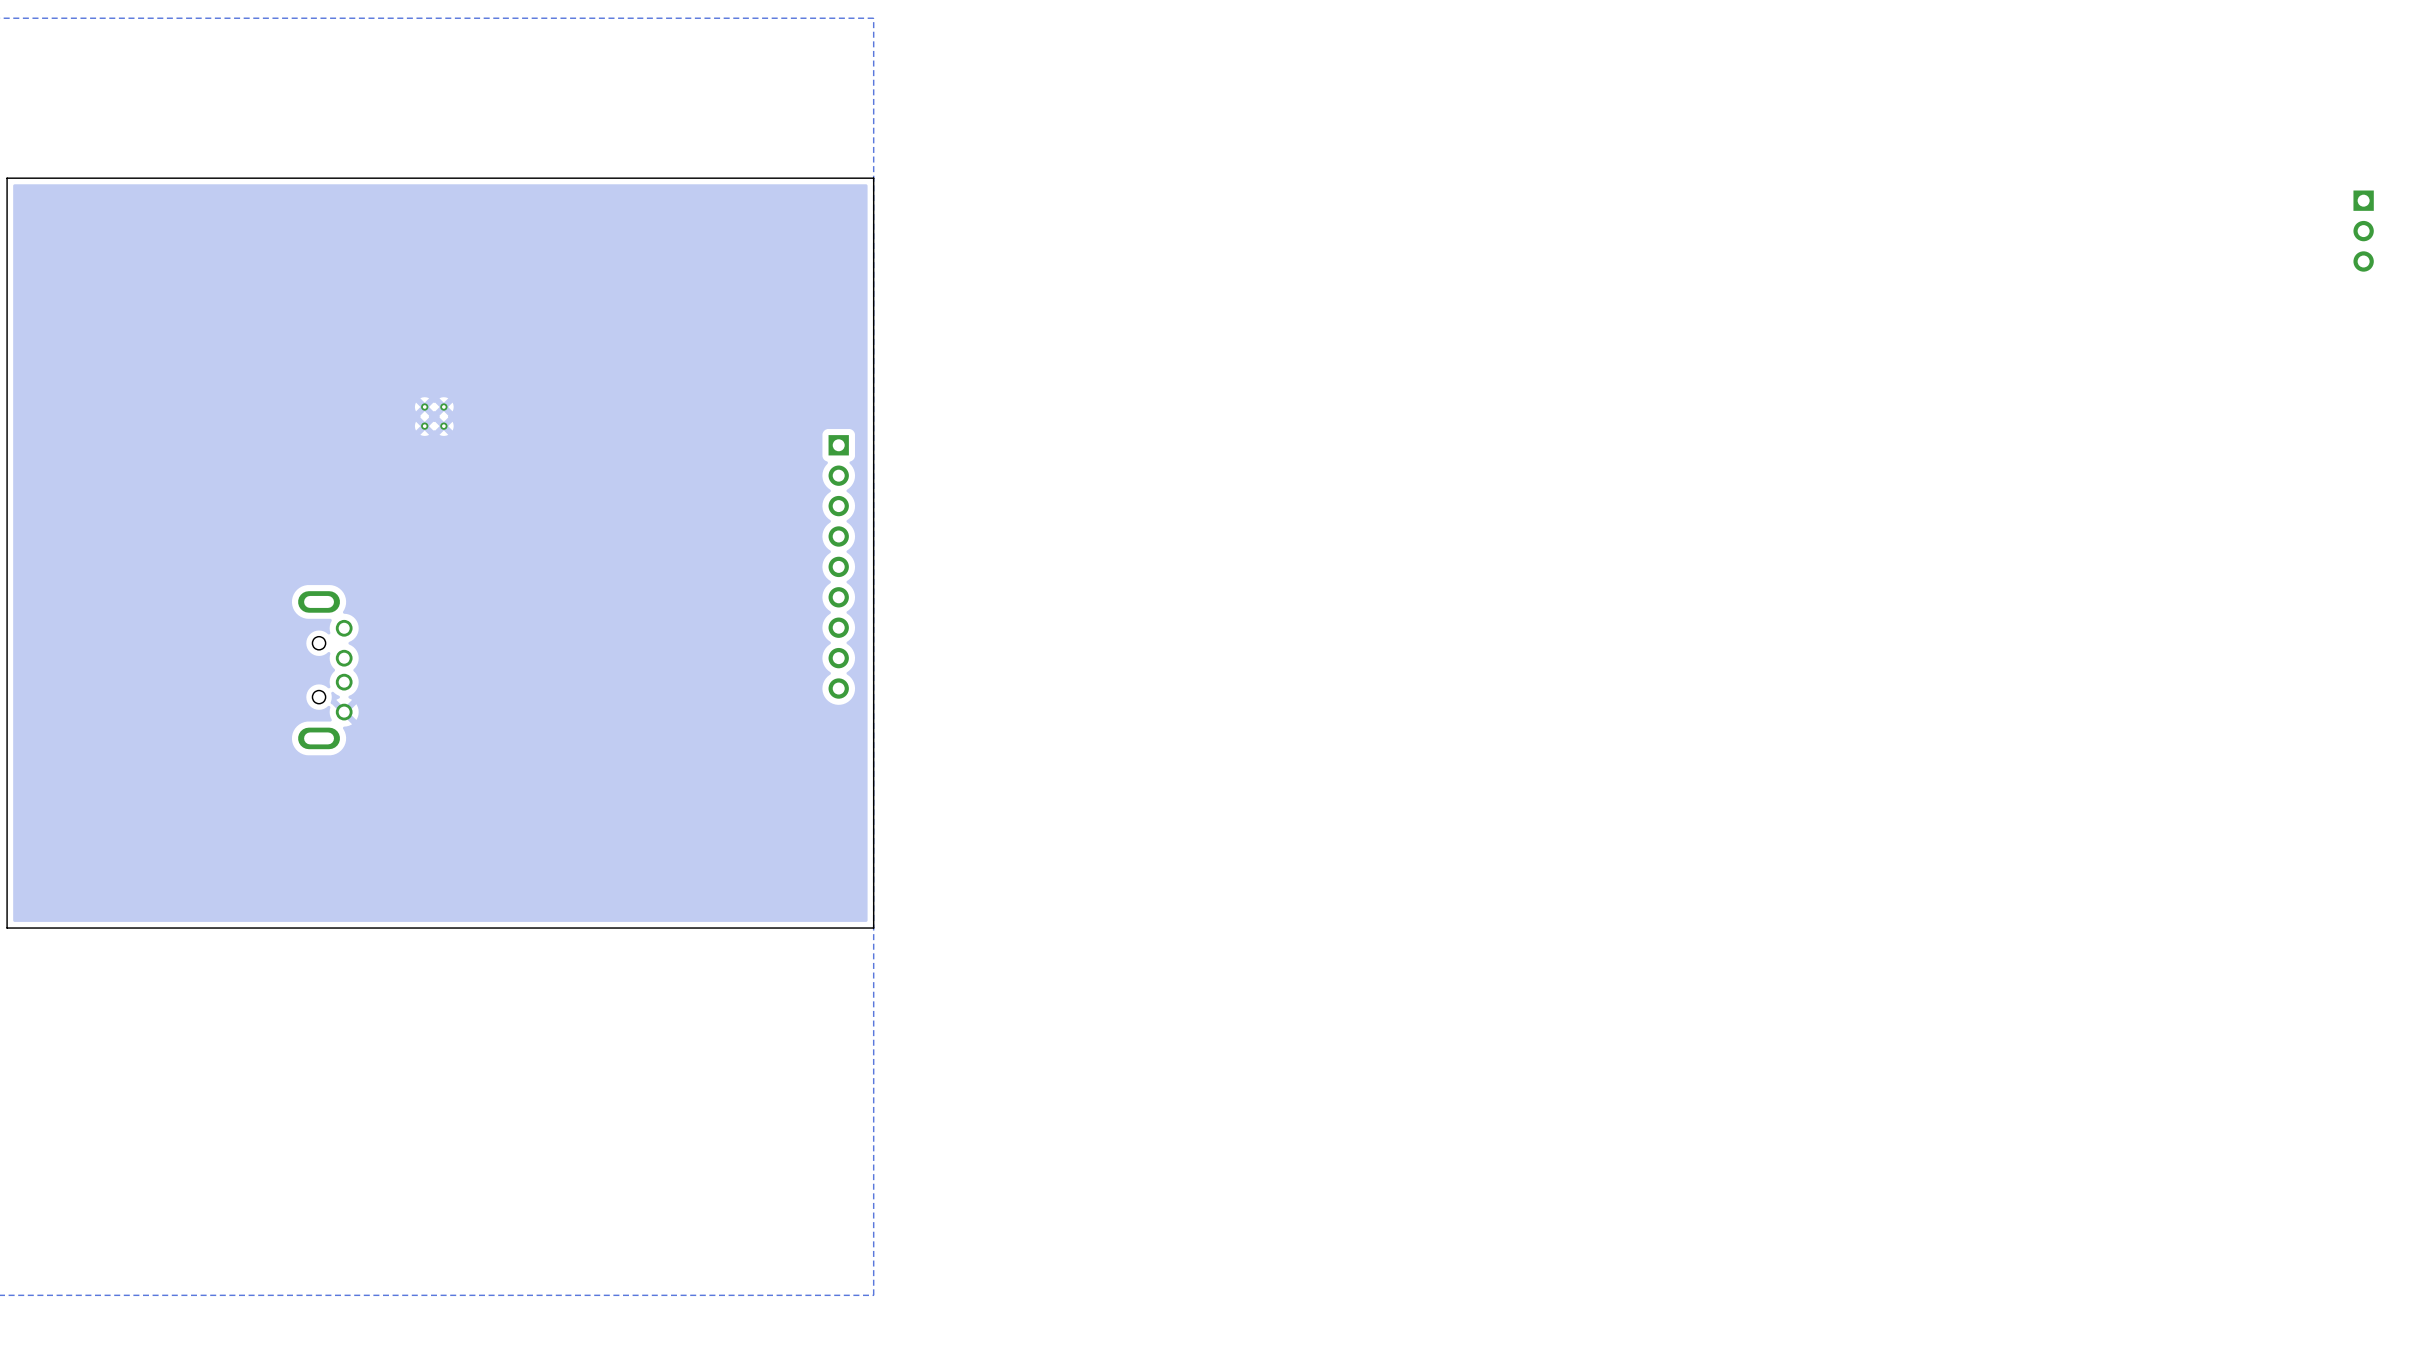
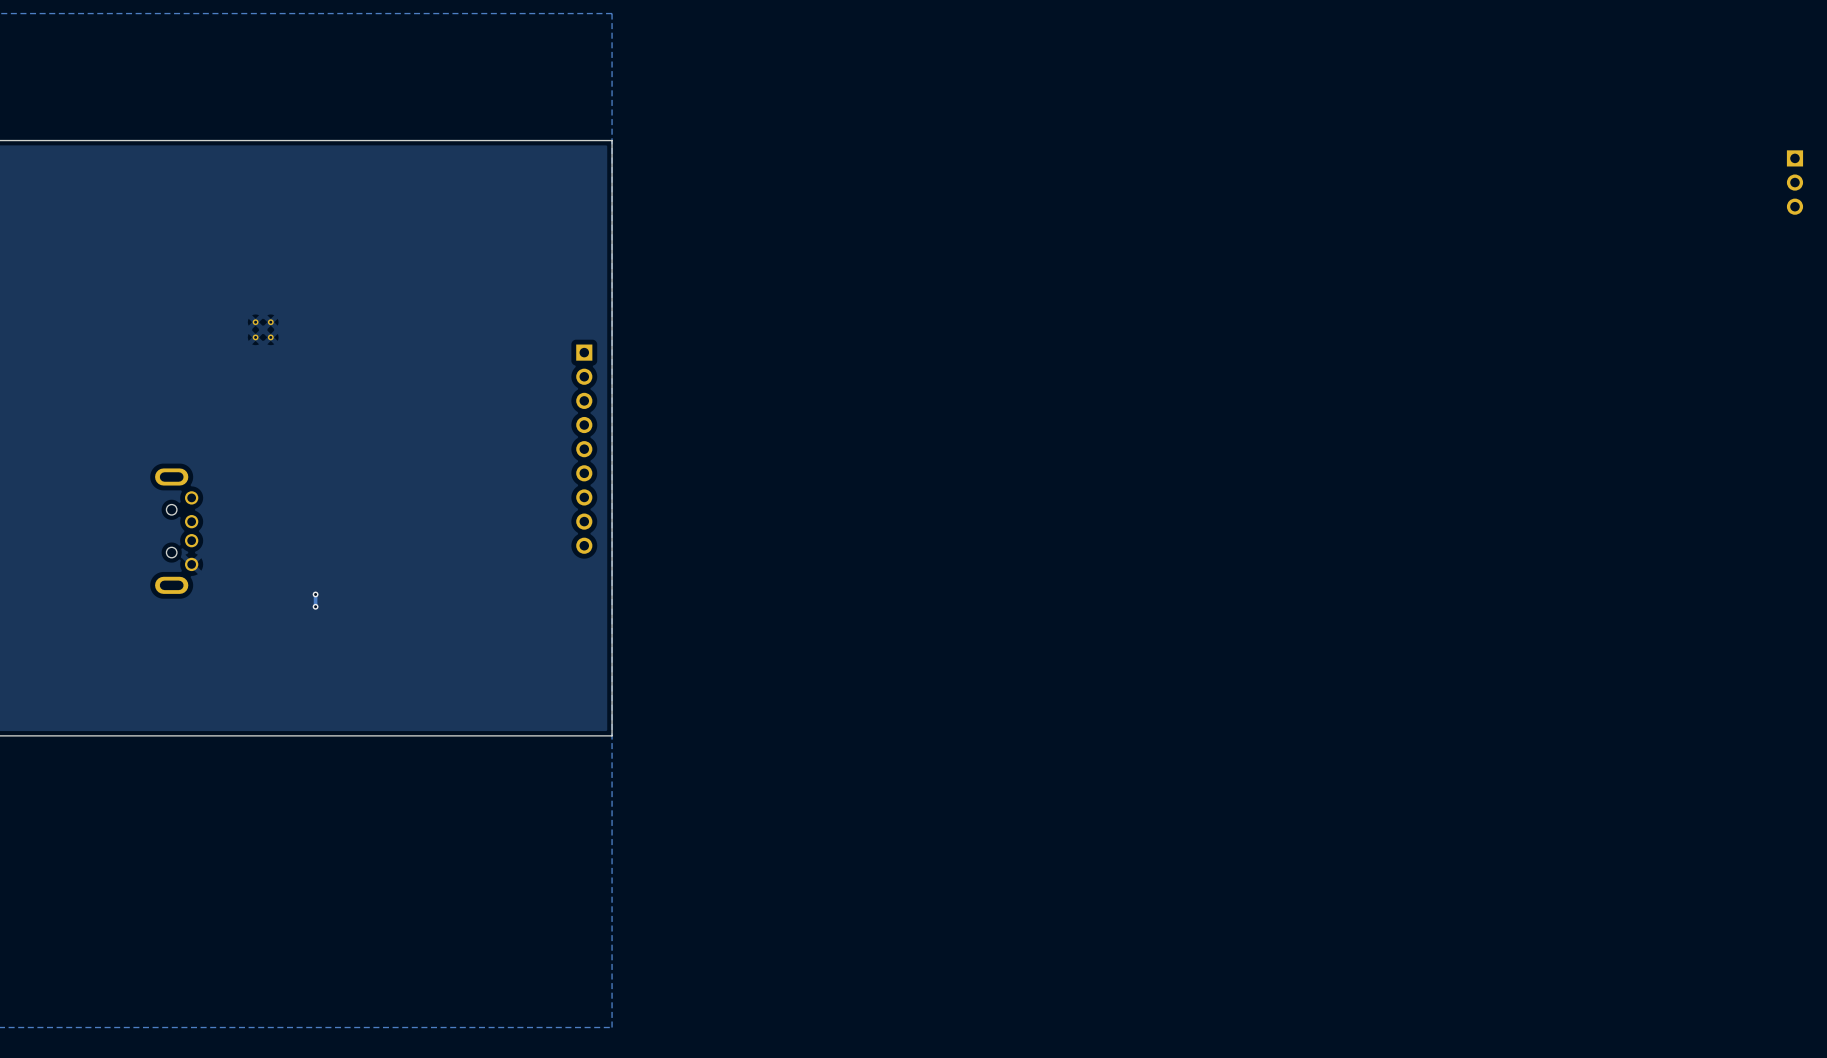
track: none -> (315, 594) (315, 606)
via: none -> (315, 594)
via: none -> (315, 606)

